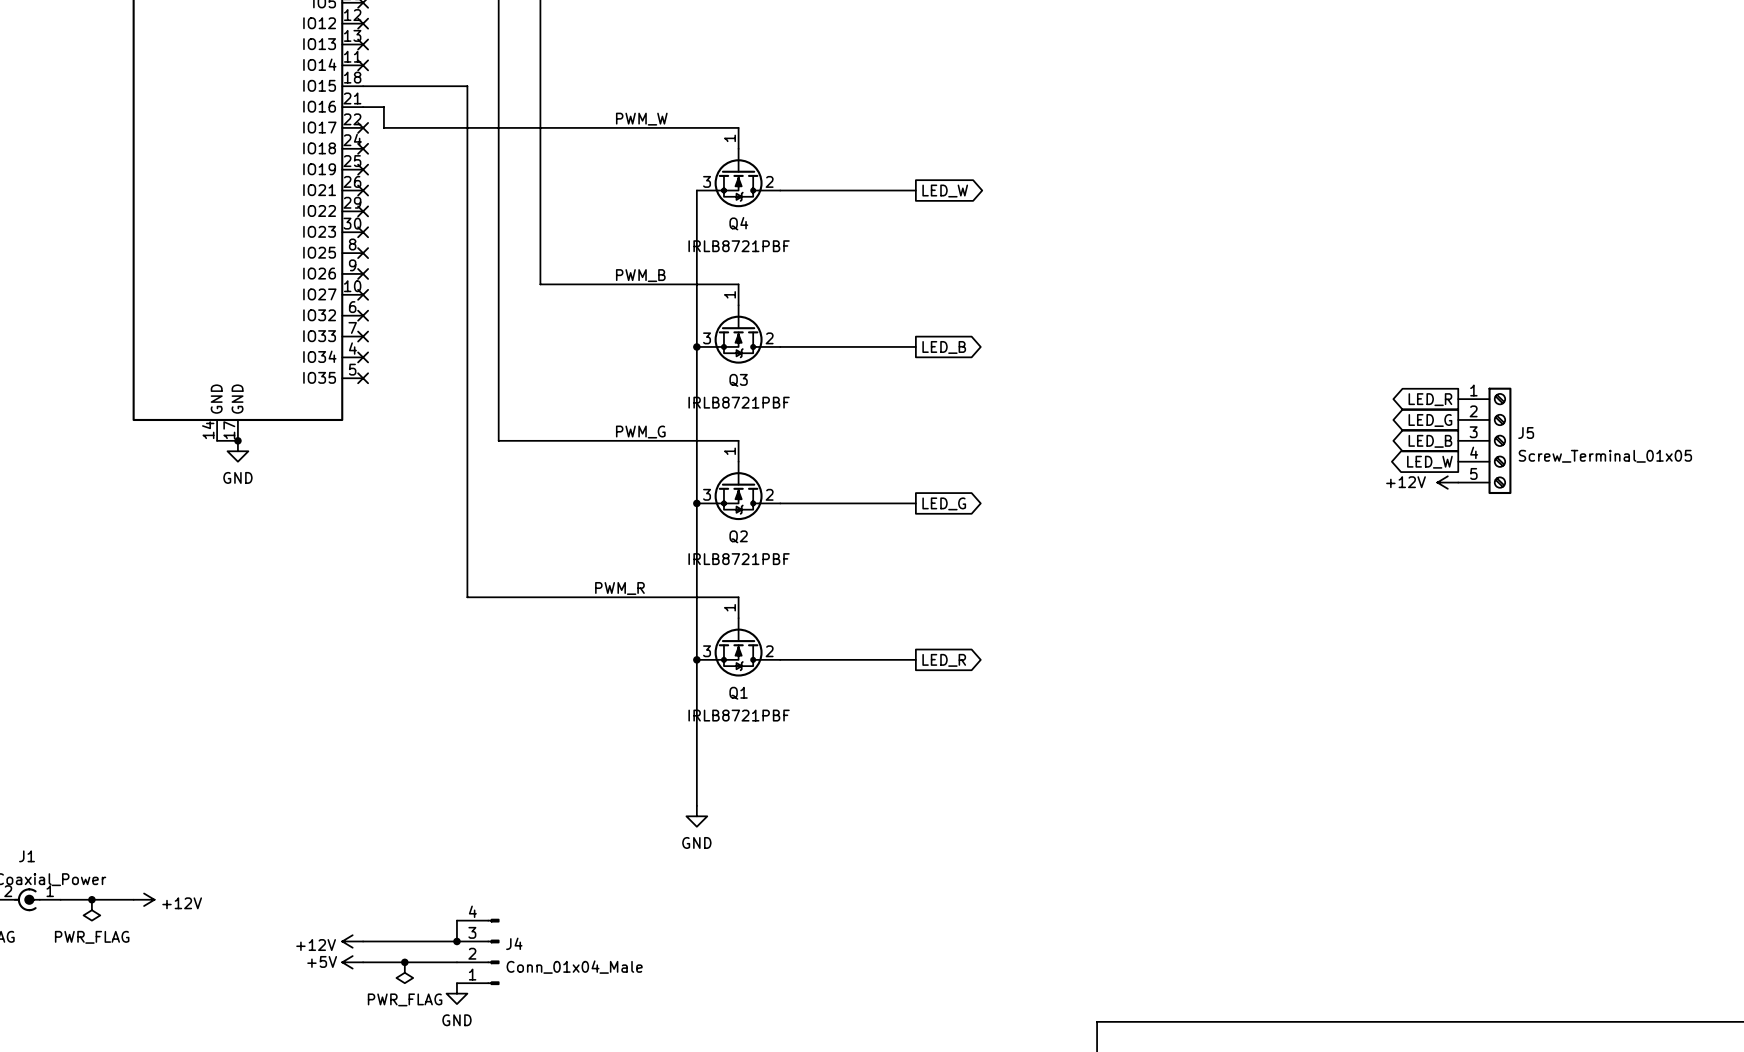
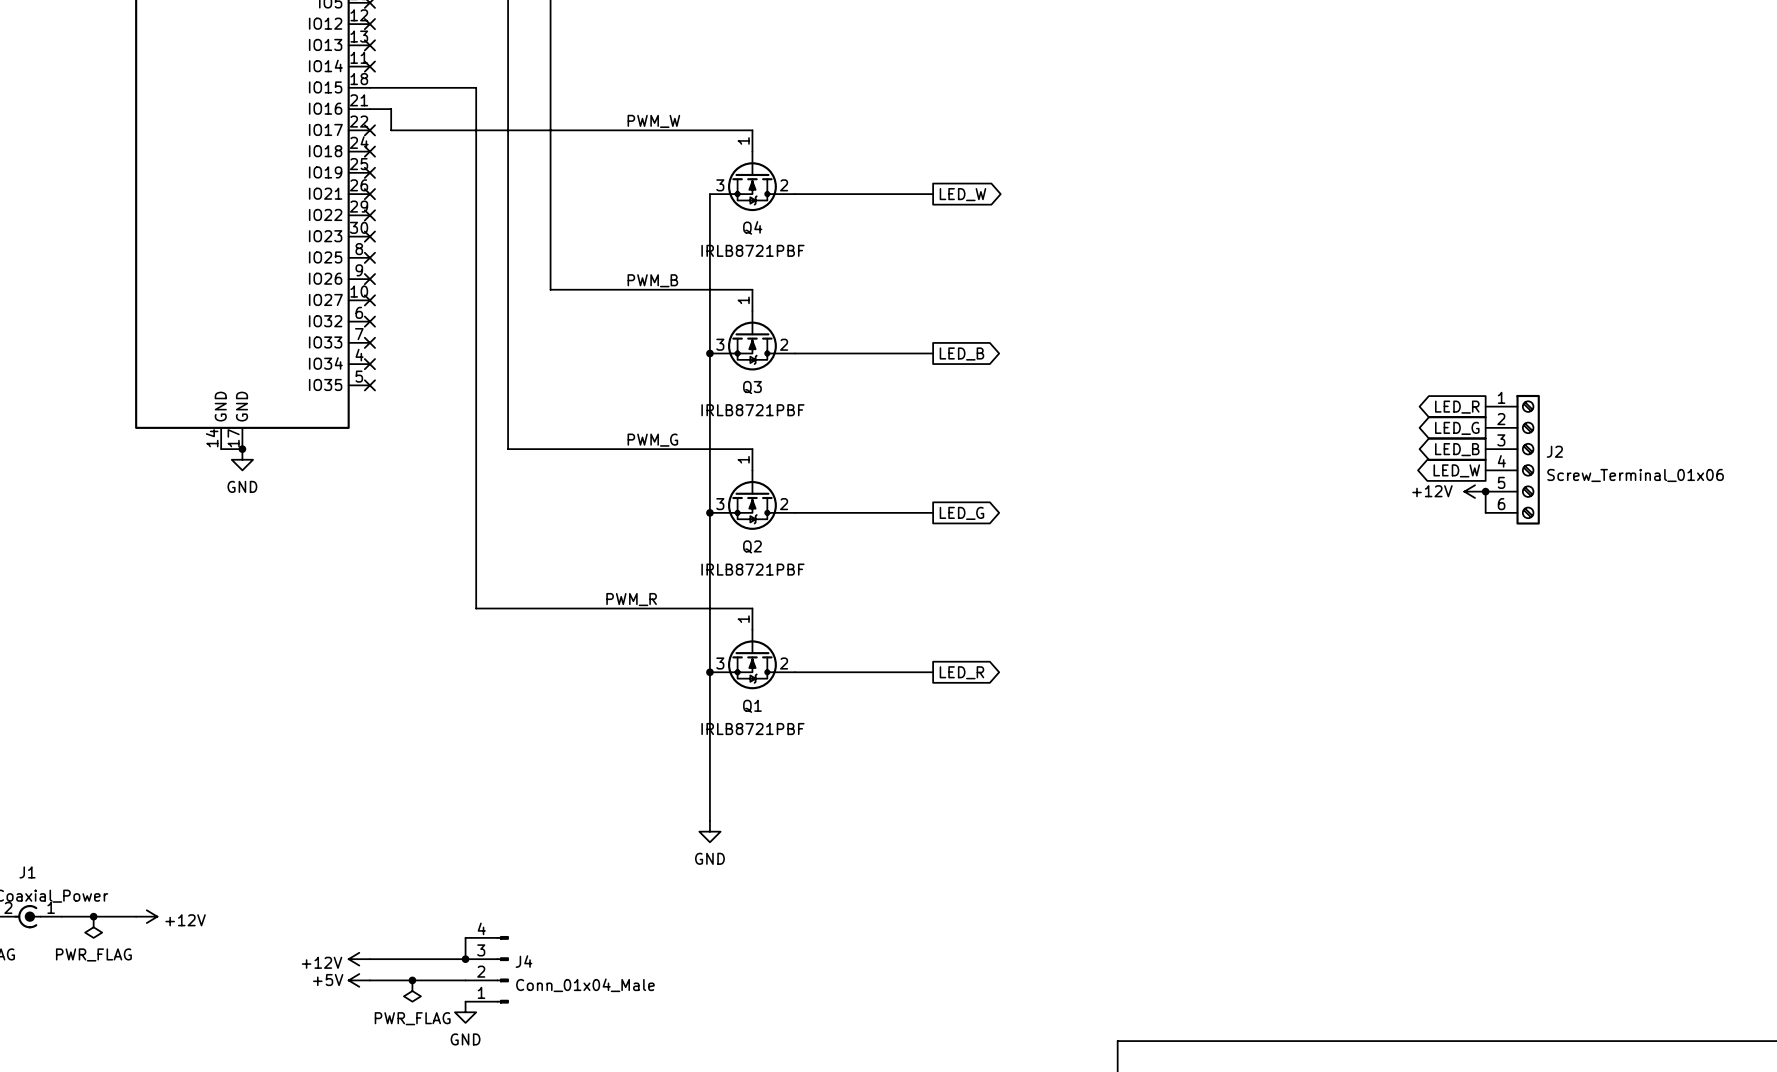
J5: Screw_Terminal_01x05 (1484, 440) -> none
J2: none -> Screw_Terminal_01x06 (1512, 459)
wire: none -> (1485, 491) (1485, 512)
junction: none -> (1485, 491)

